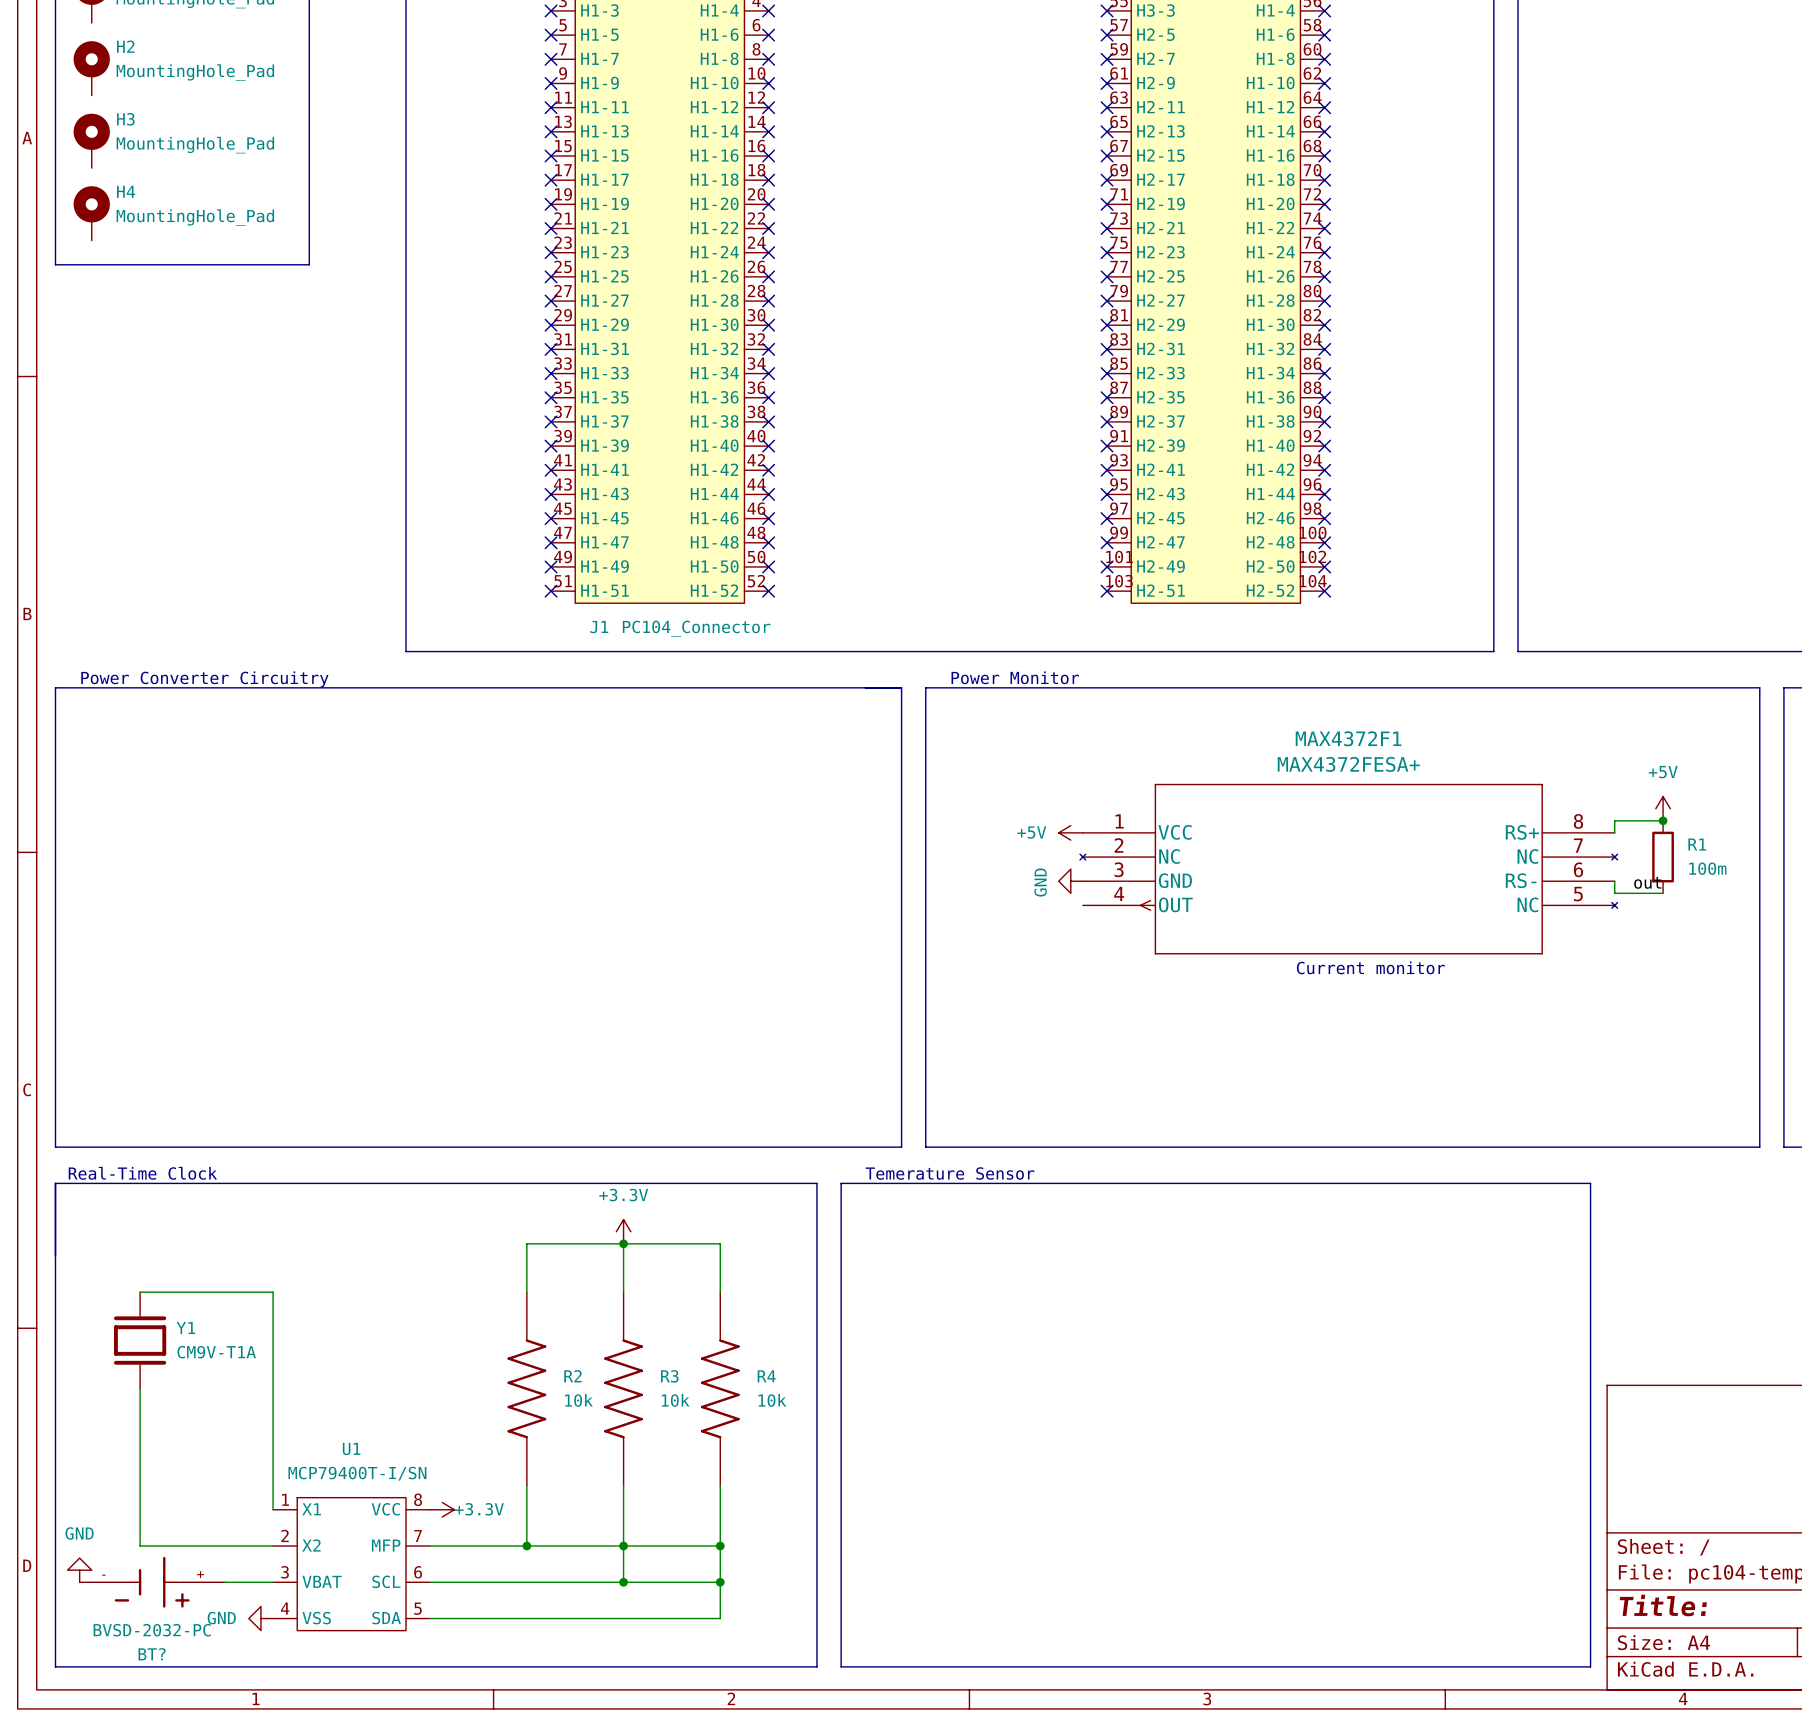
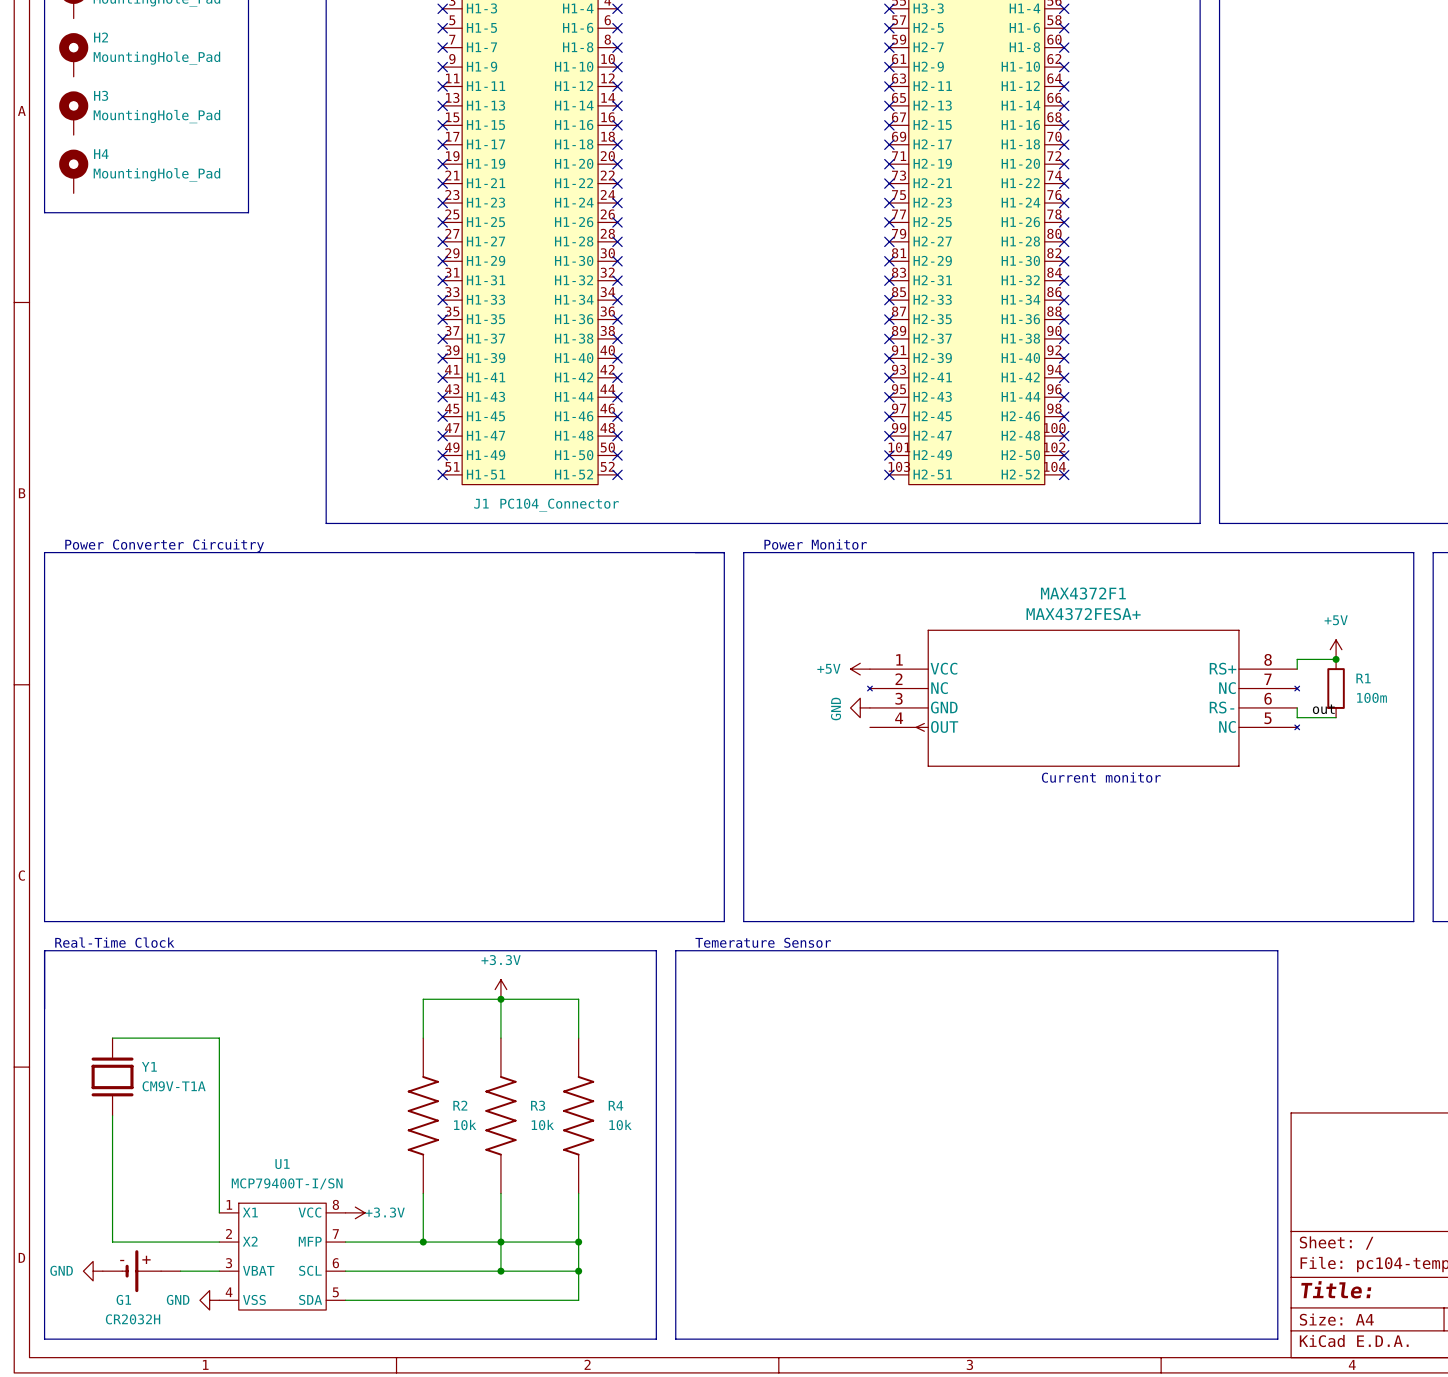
power symbol rotation: 0° (79, 1570) -> 90° counterclockwise (93, 1271)
power symbol position: GND (79, 1570) -> GND (93, 1271)
BT?: BVSD-2032-PC (152, 1582) -> none
G1: none -> CR2032H (141, 1271)

